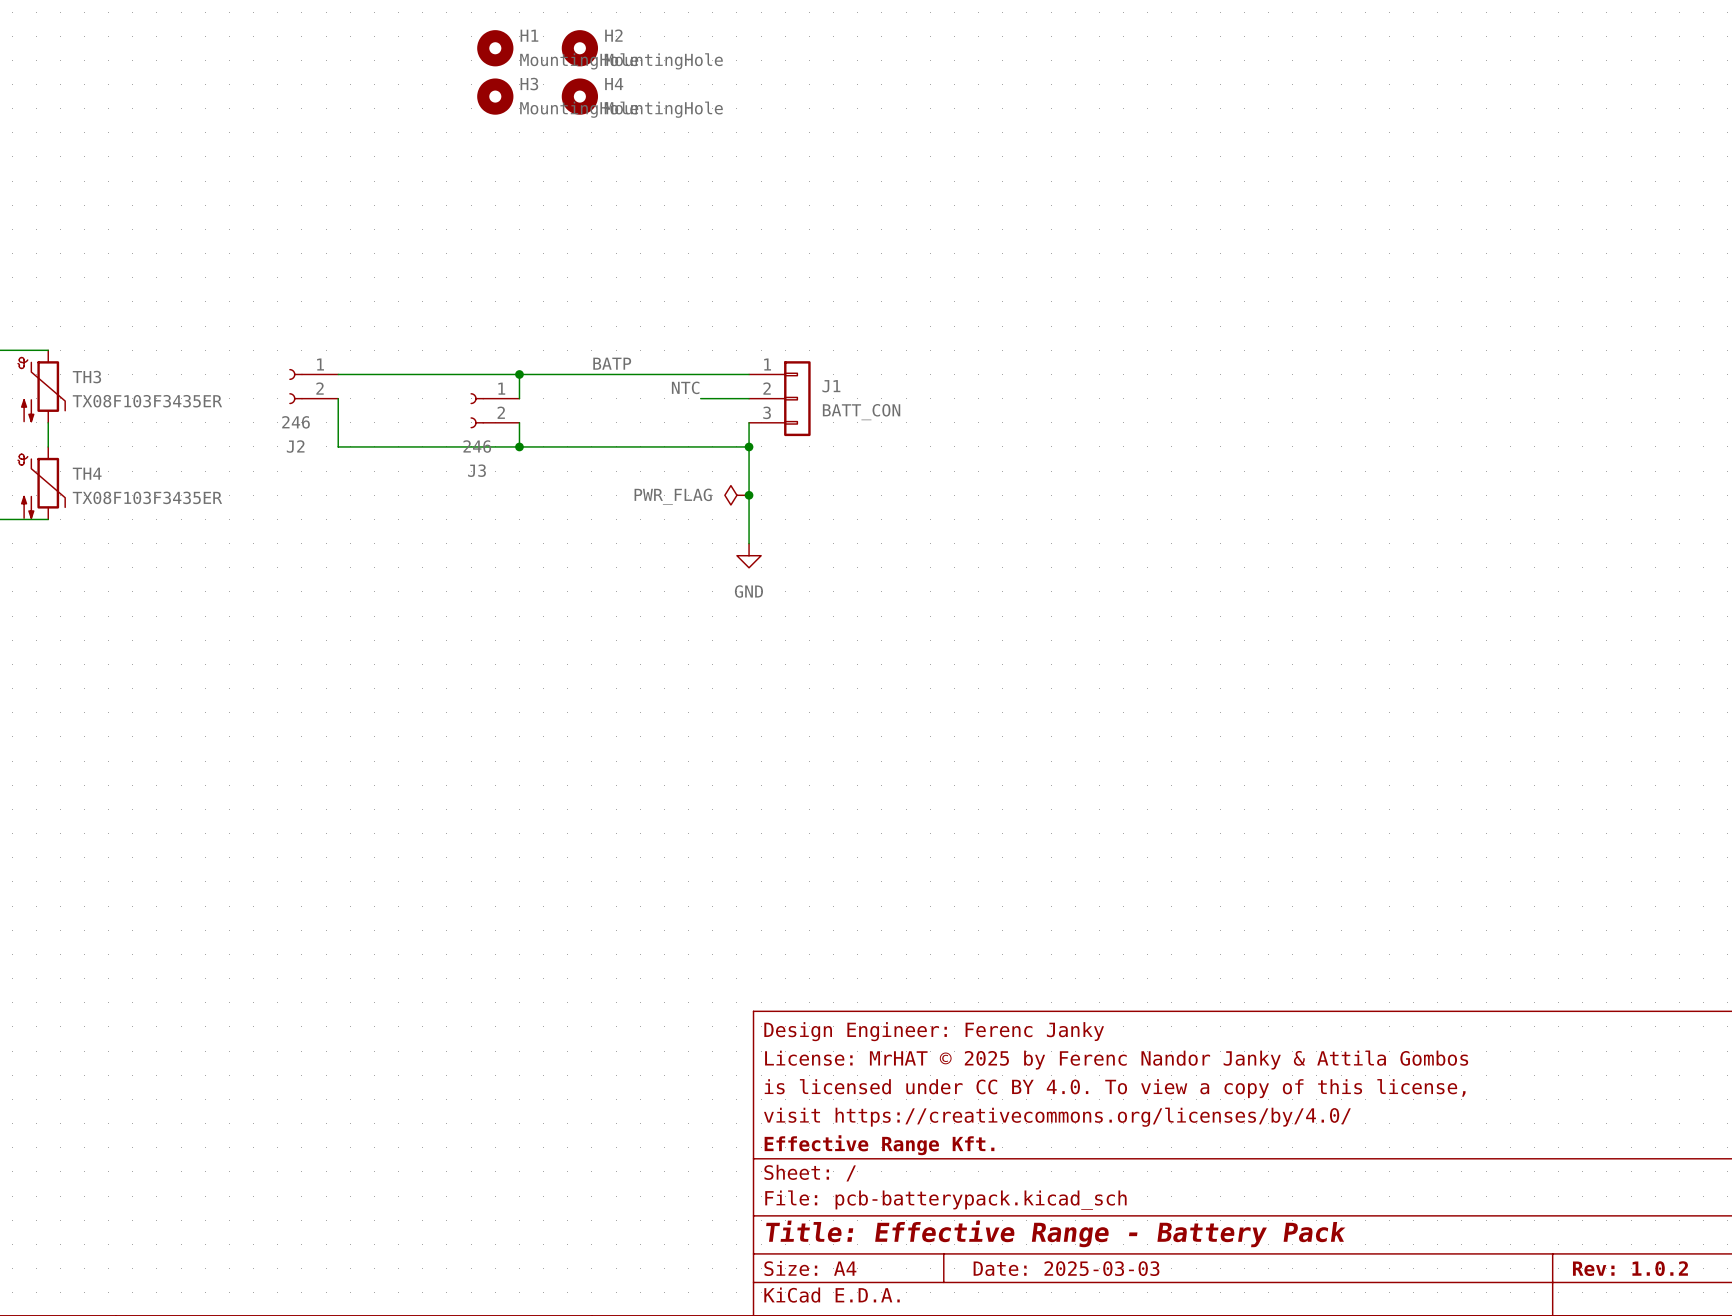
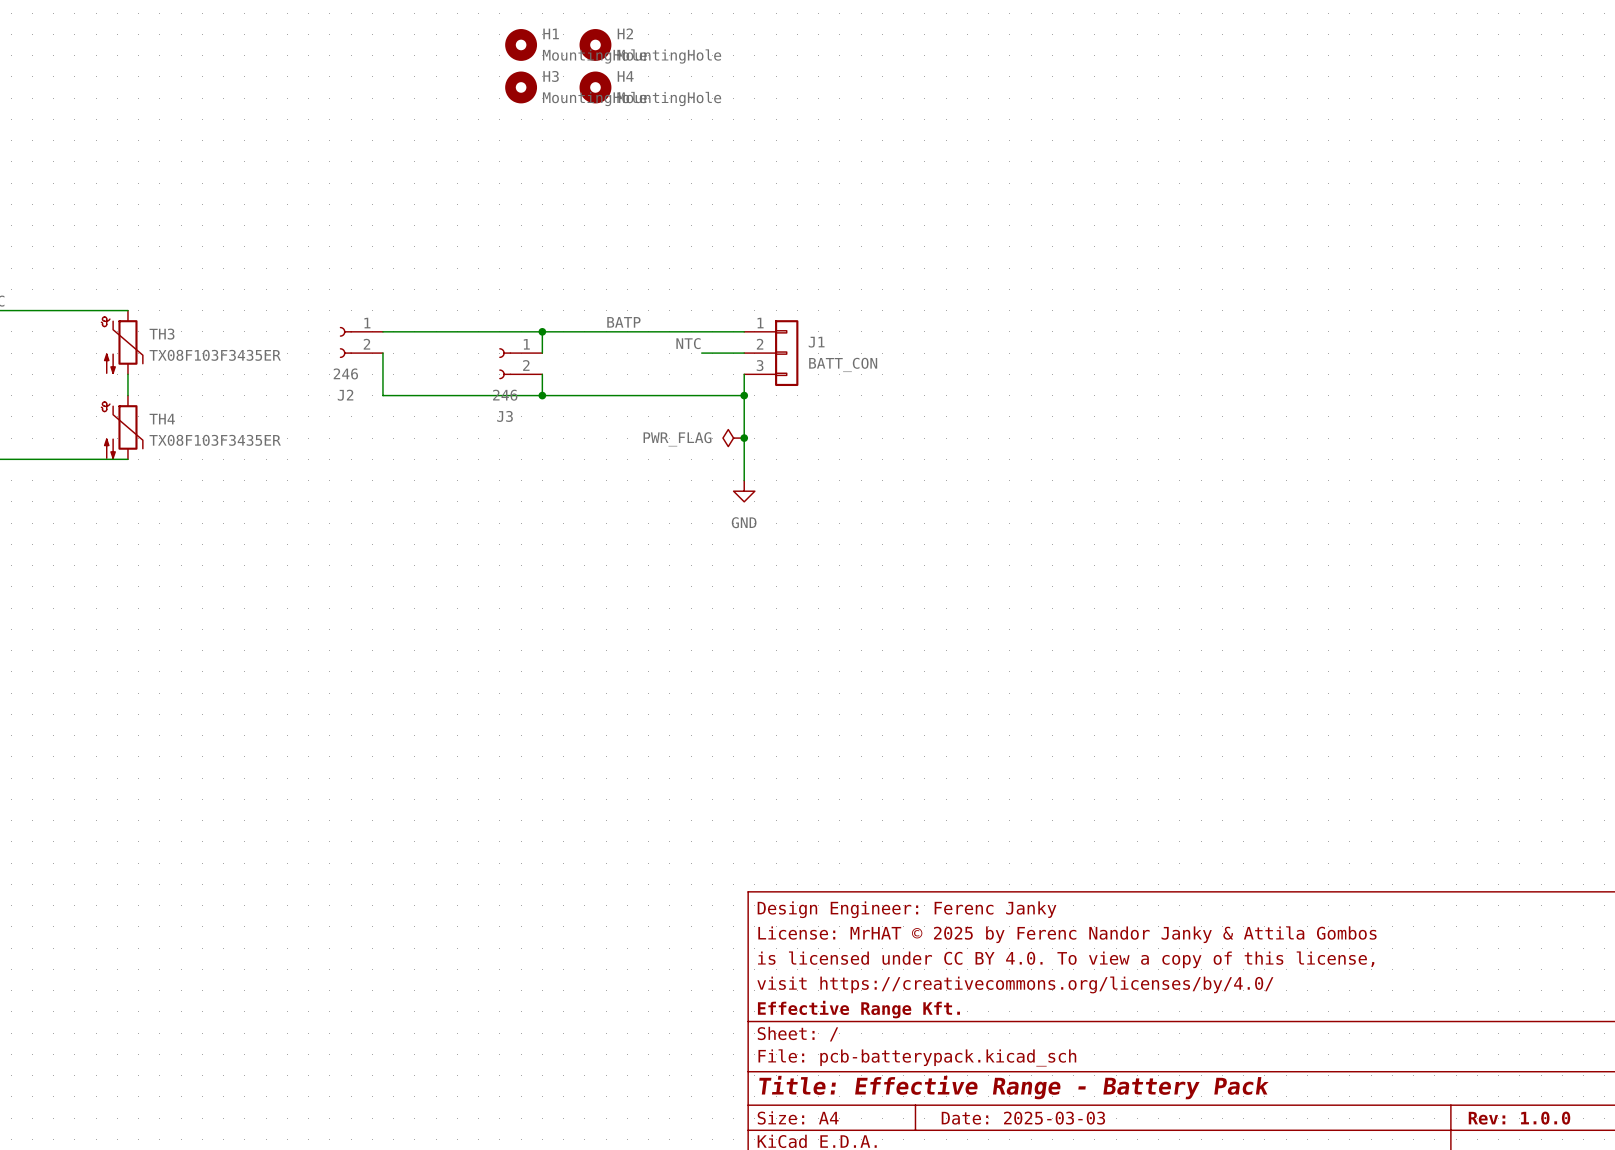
title block: Rev: 1.0.2 (1630, 1268) -> Rev: 1.0.0 (1519, 1118)

